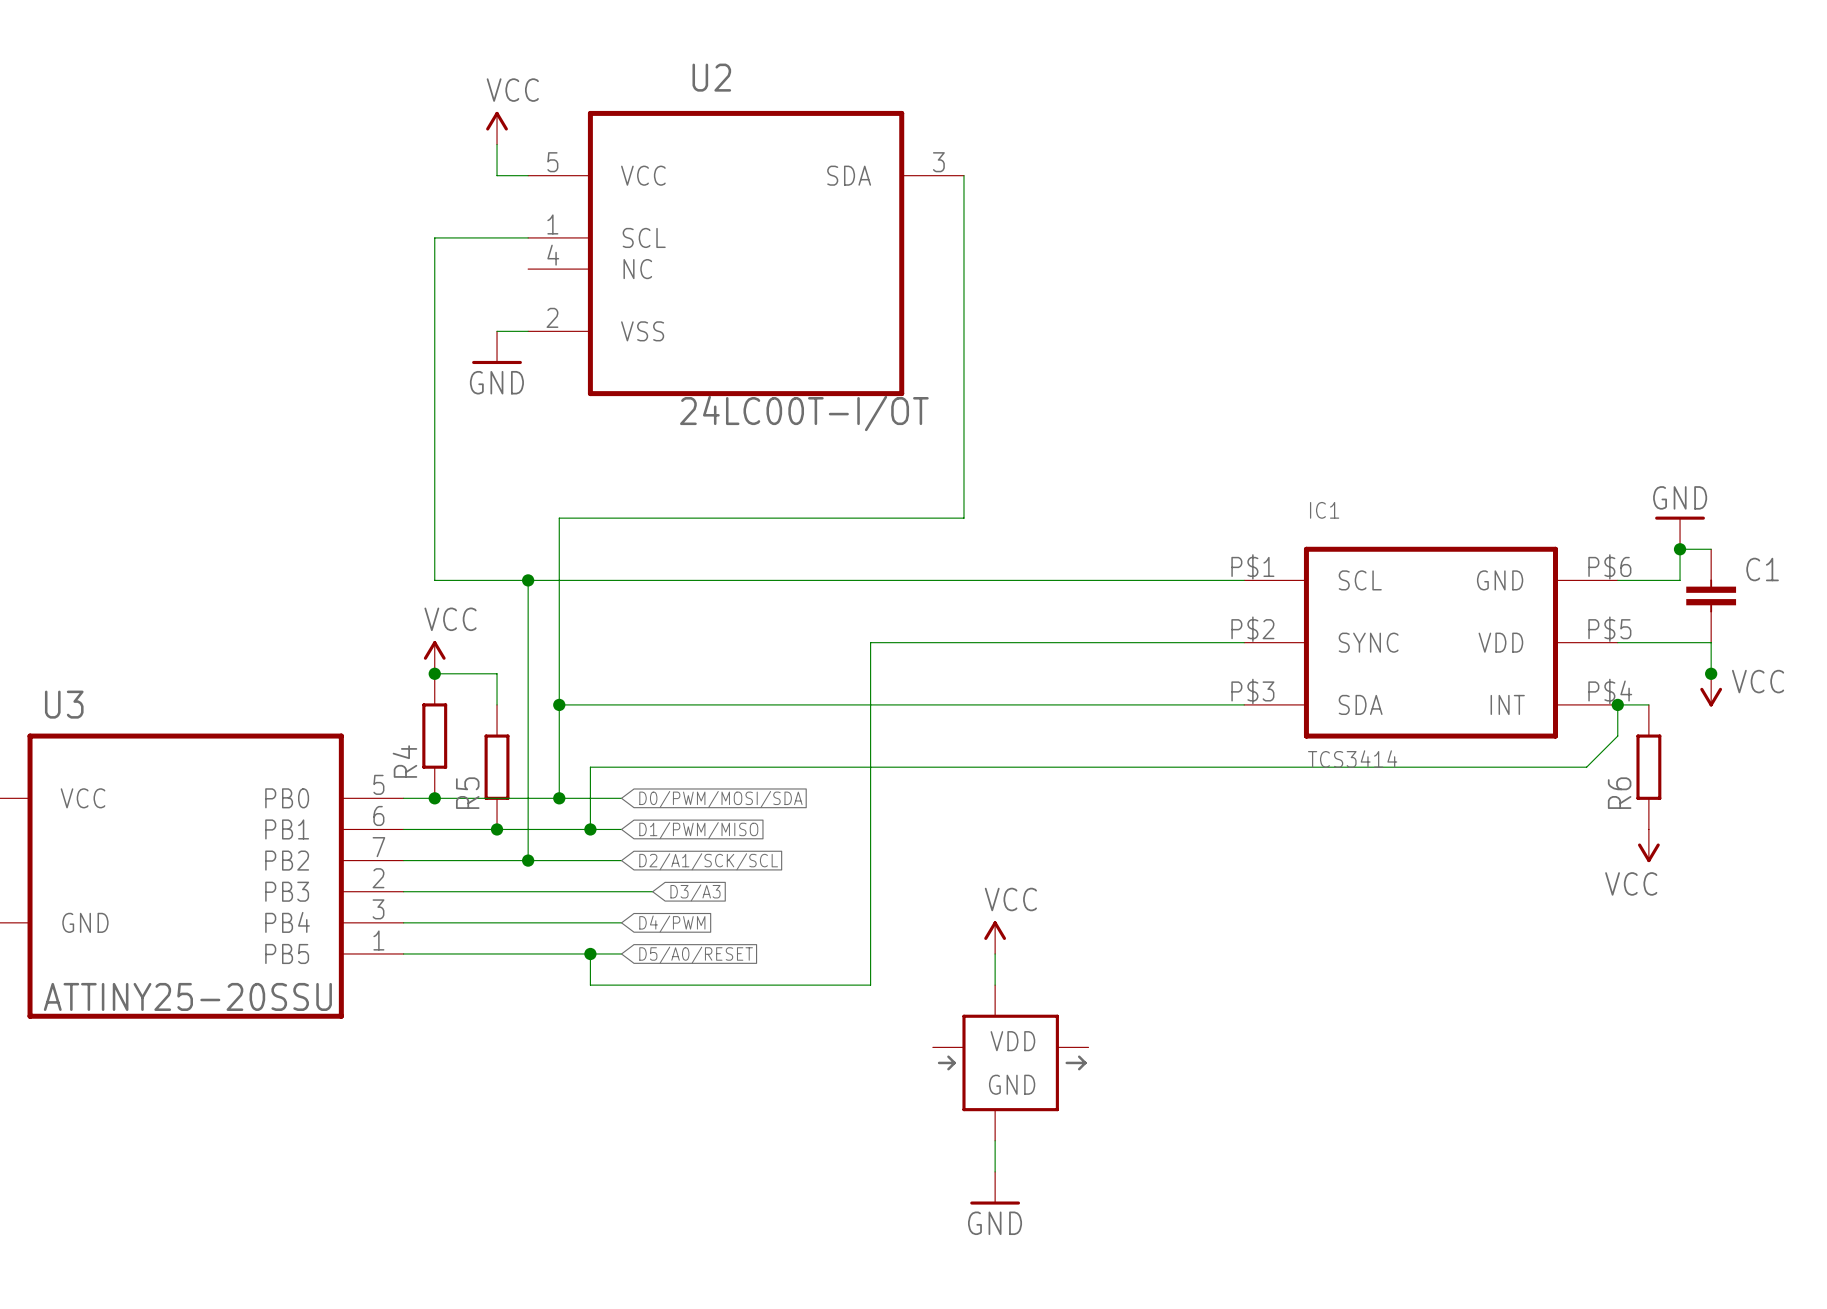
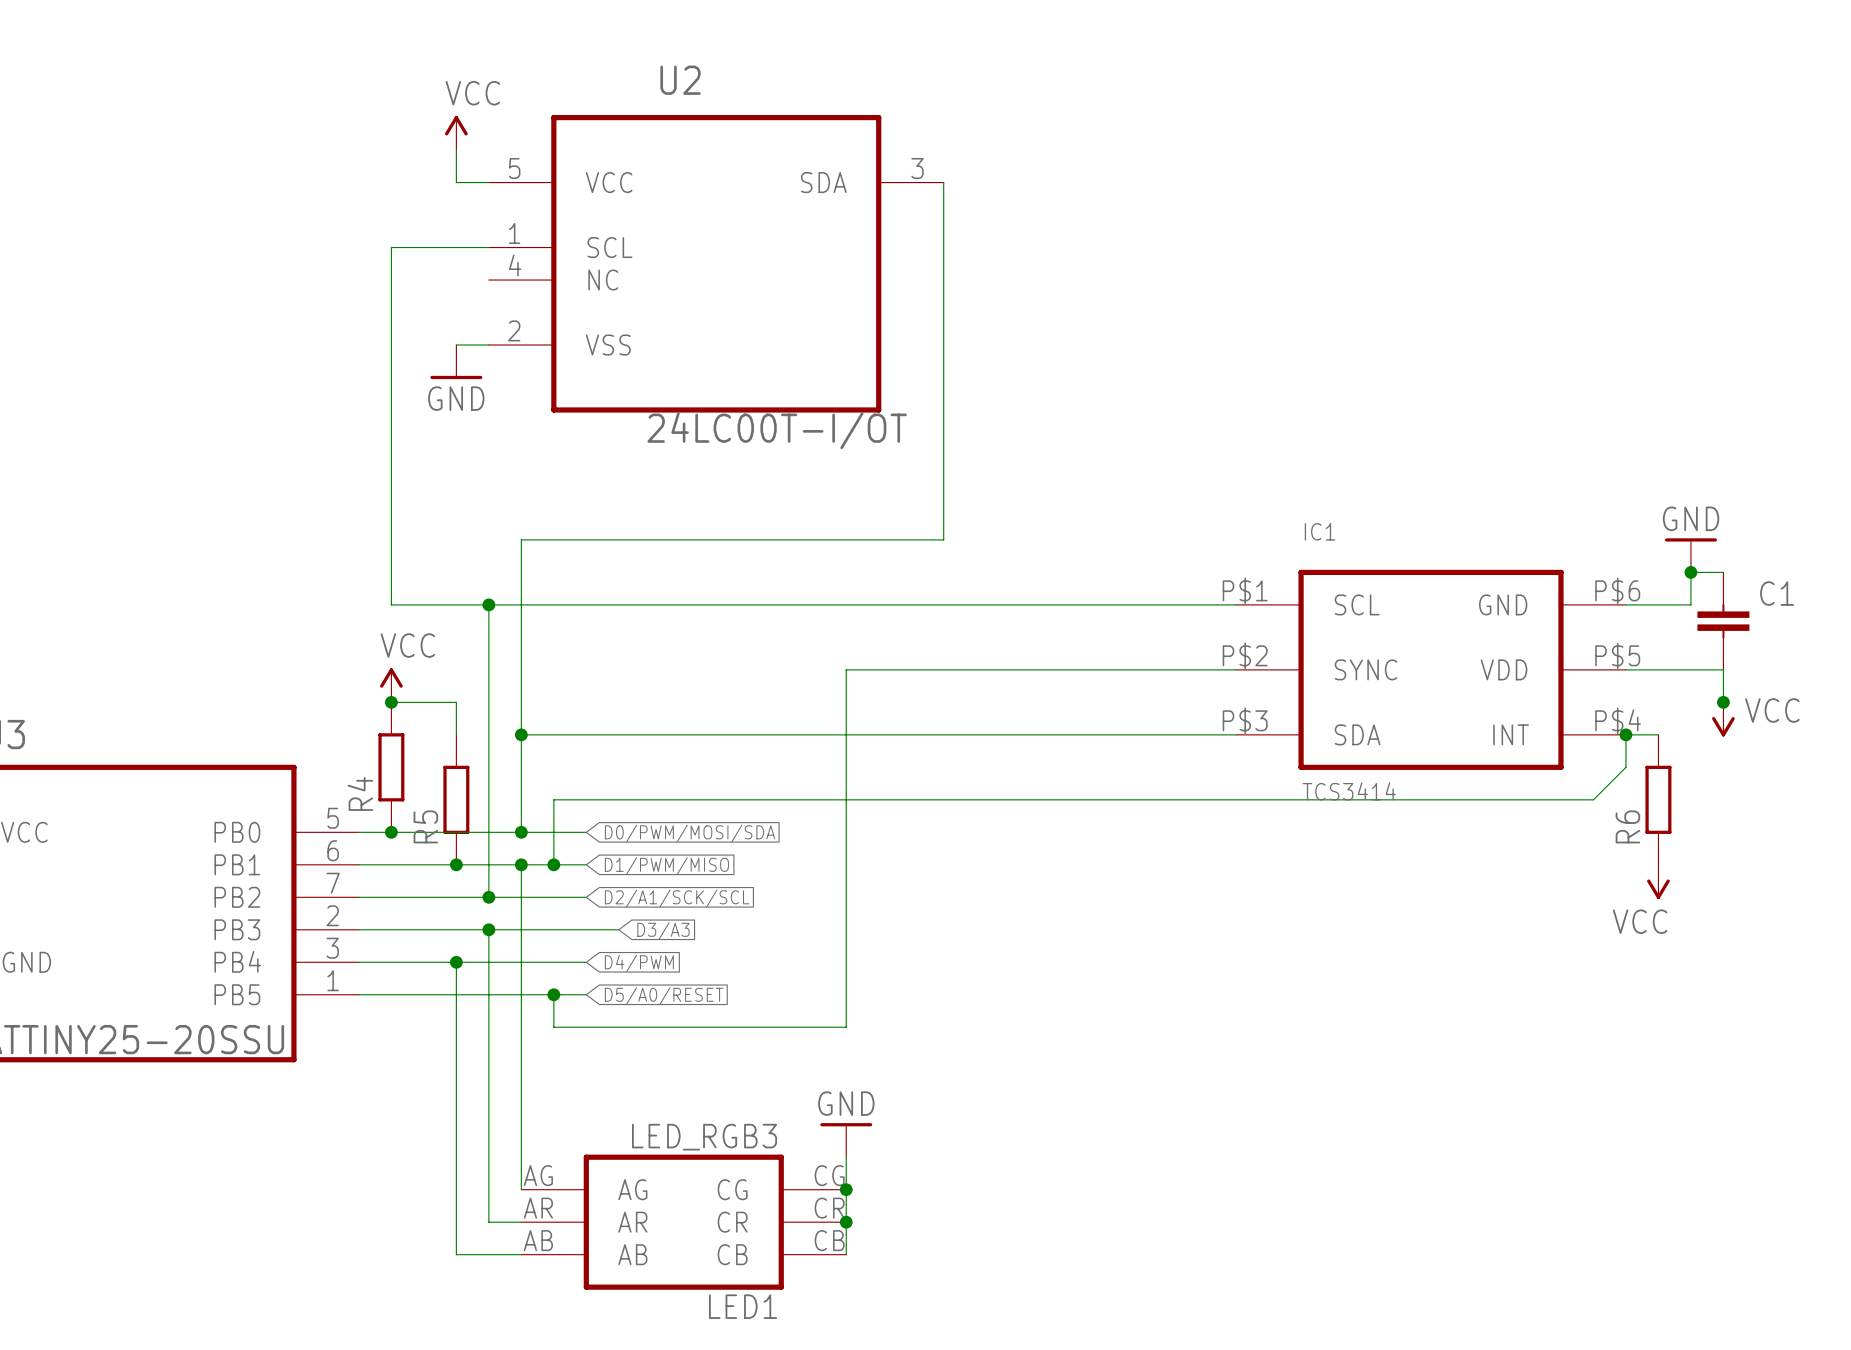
wire: none -> (521, 864) (521, 1189)
junction: none -> (521, 864)
wire: none -> (488, 929) (488, 1222) (521, 1222)
junction: none -> (488, 929)
wire: none -> (456, 962) (456, 1254) (521, 1254)
junction: none -> (456, 962)
power symbol: VCC (995, 937) -> none
wire: (995, 953) (995, 985) -> none
part: (1010, 1062) -> none
wire: none -> (846, 1157) (846, 1254)
junction: none -> (846, 1189)
wire: (995, 1140) (995, 1171) -> none
LED1: none -> LED_RGB3 (683, 1222)
junction: none -> (846, 1222)
power symbol position: GND (995, 1188) -> GND (846, 1140)
power symbol rotation: 0° (995, 1203) -> 180° (846, 1124)

